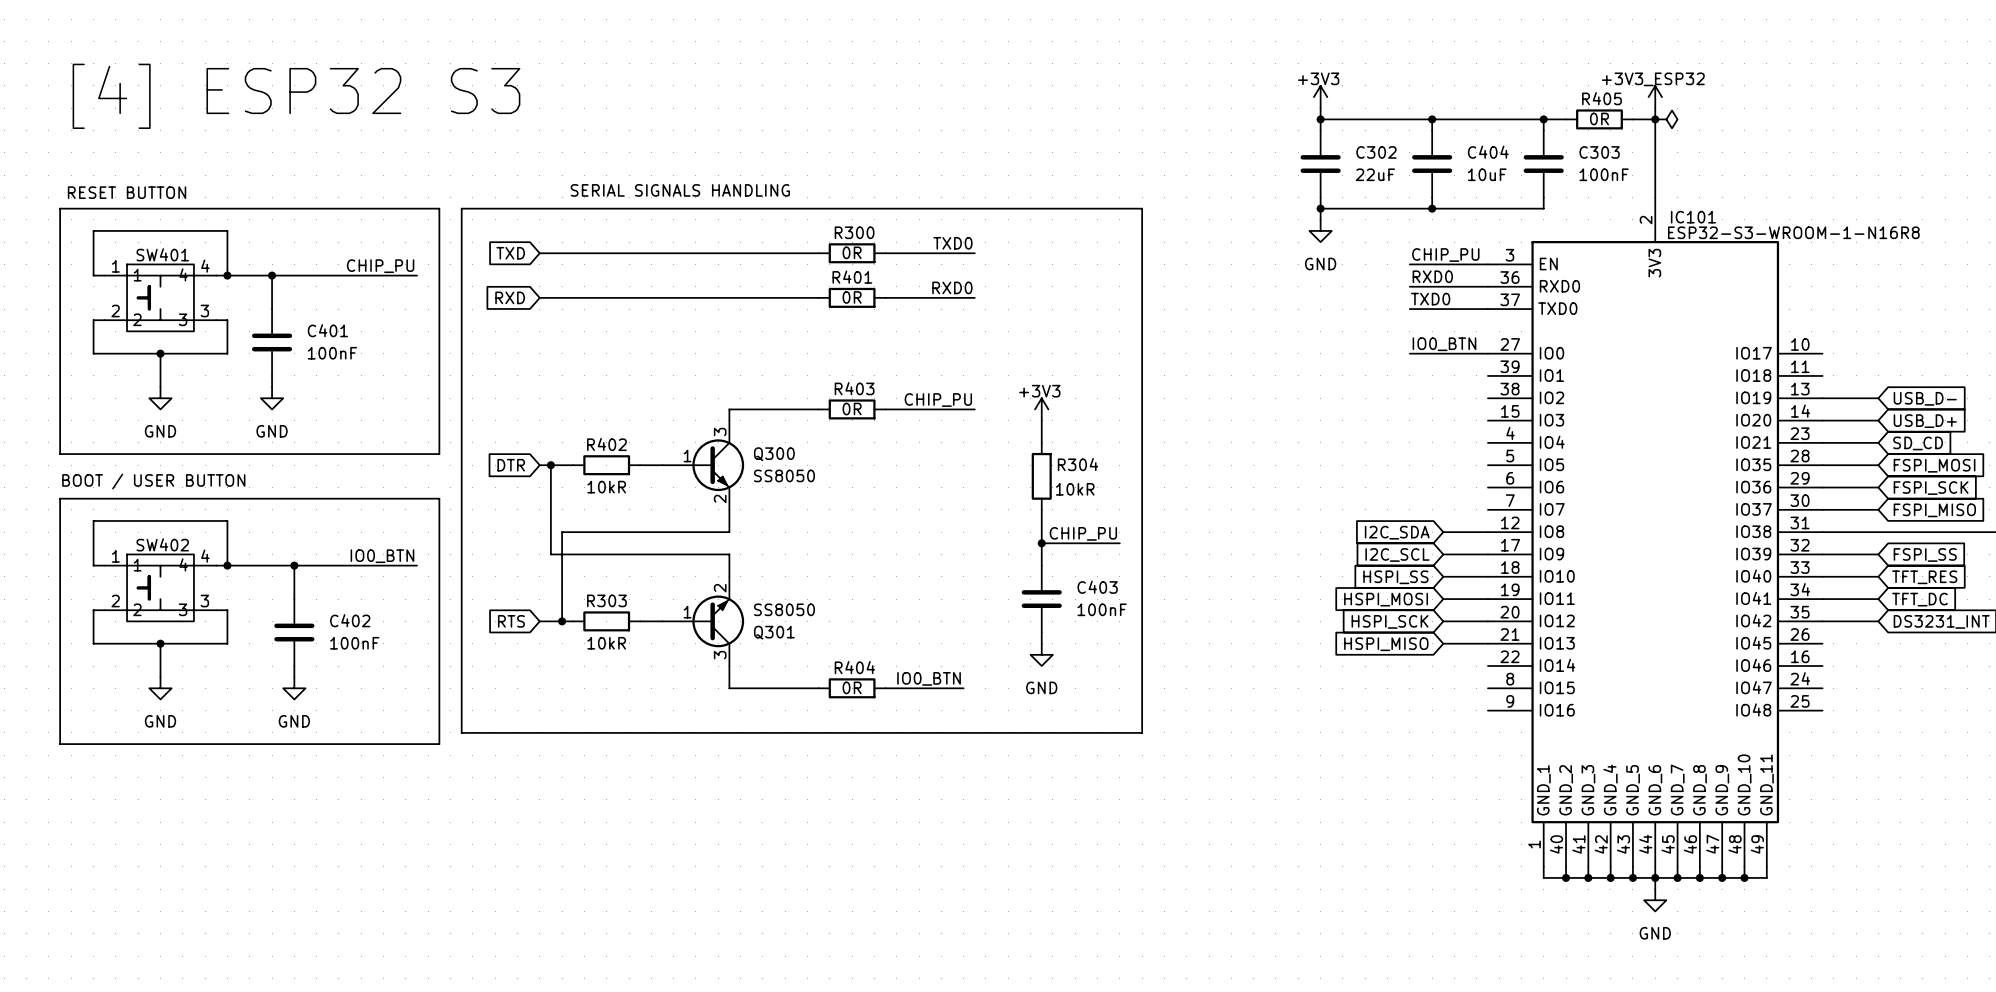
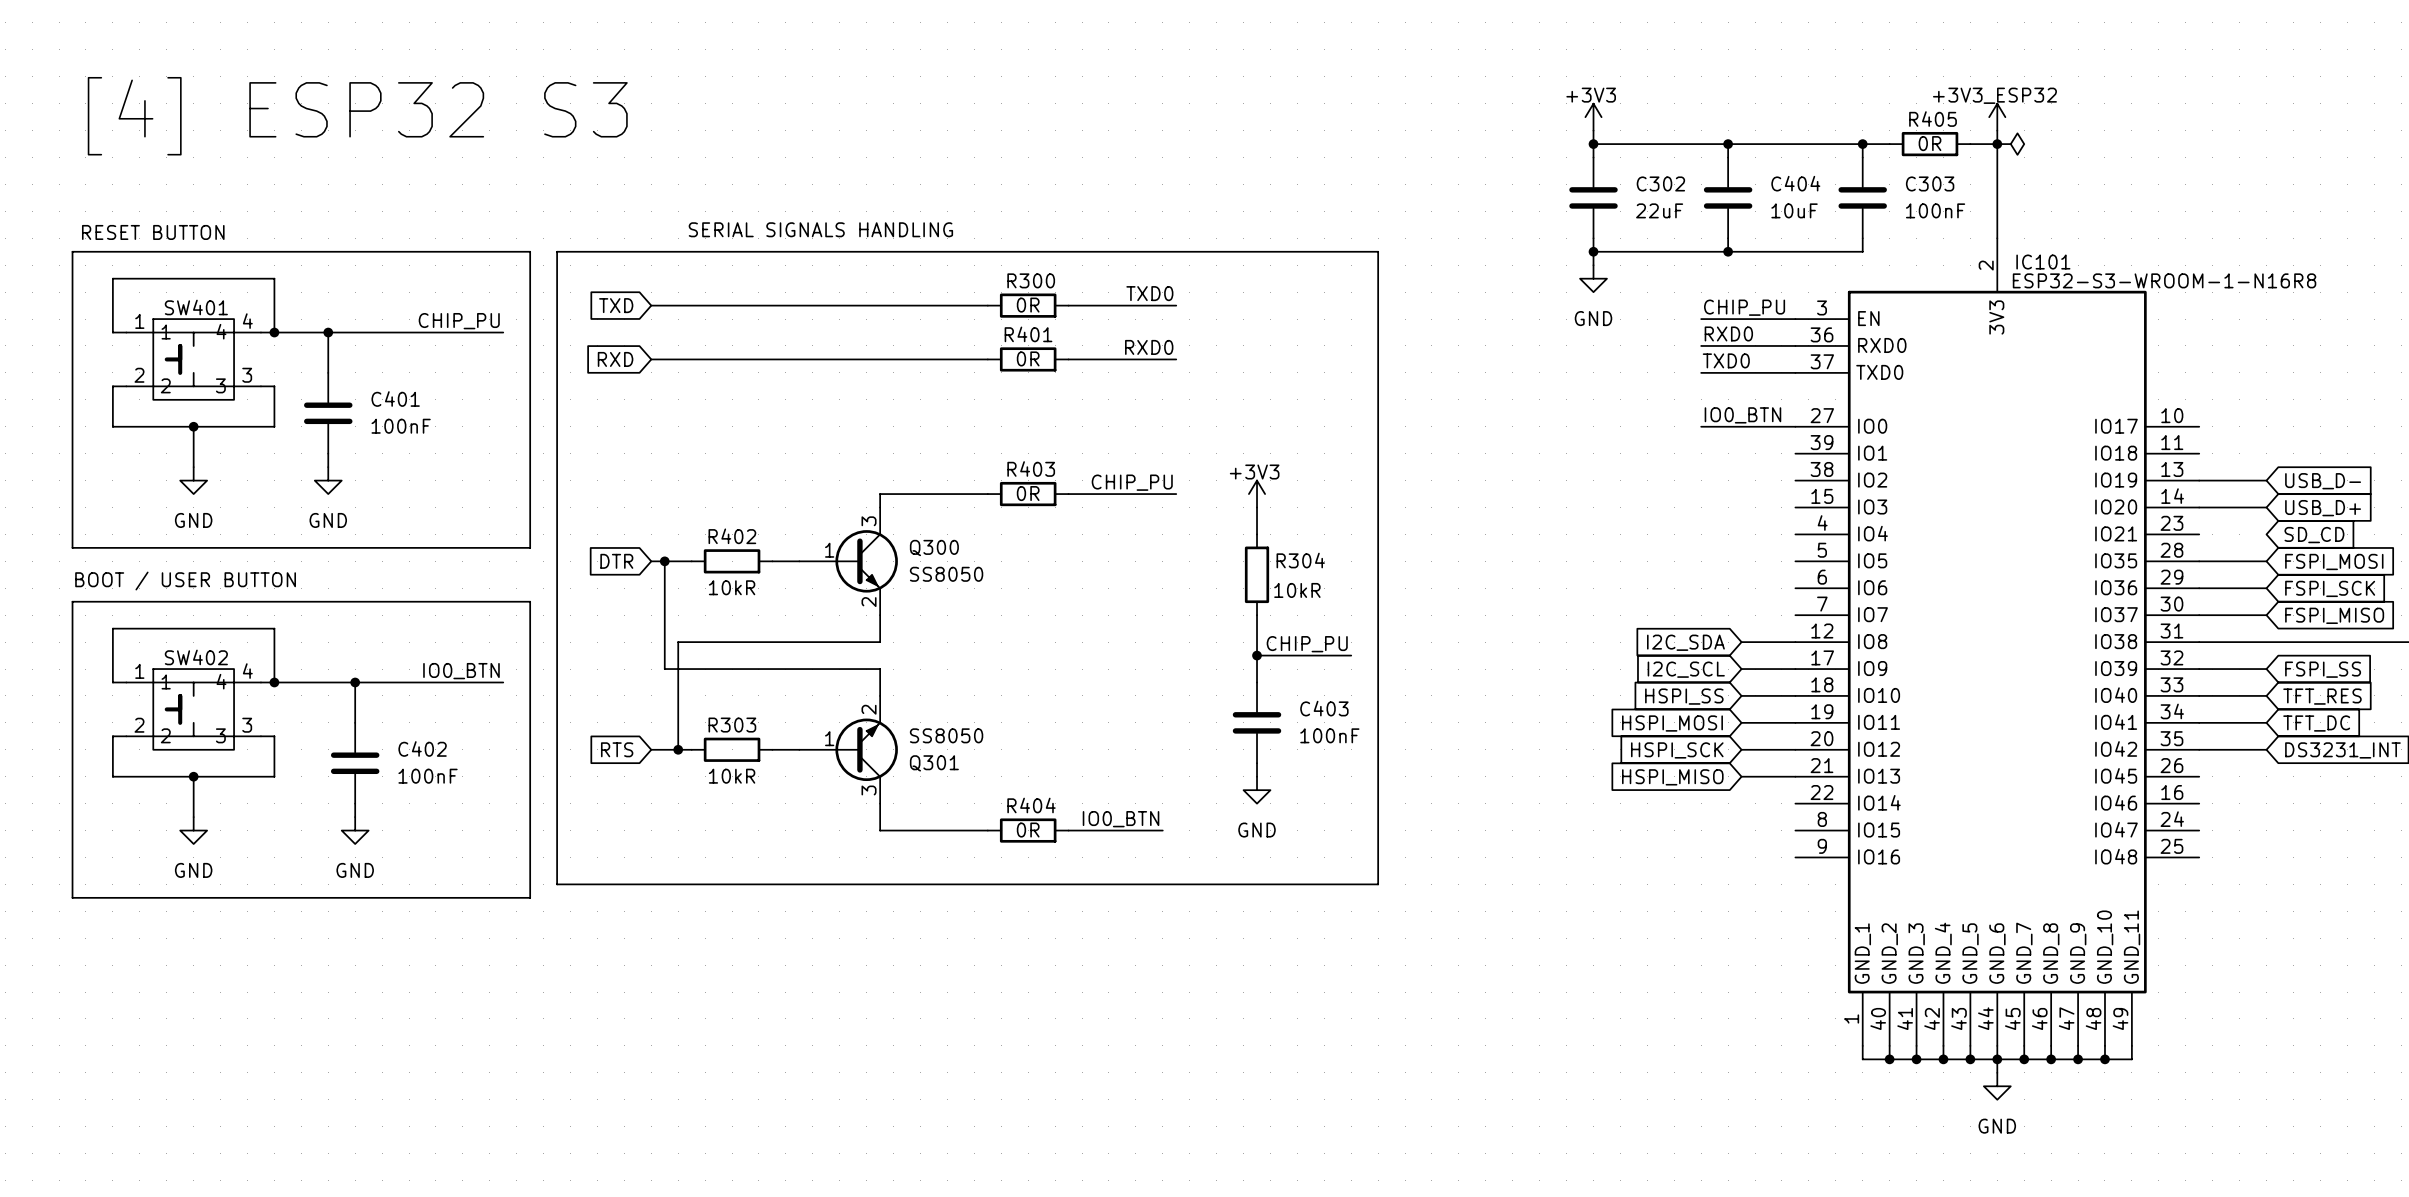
wire: (1822, 442) (1878, 442) -> none

